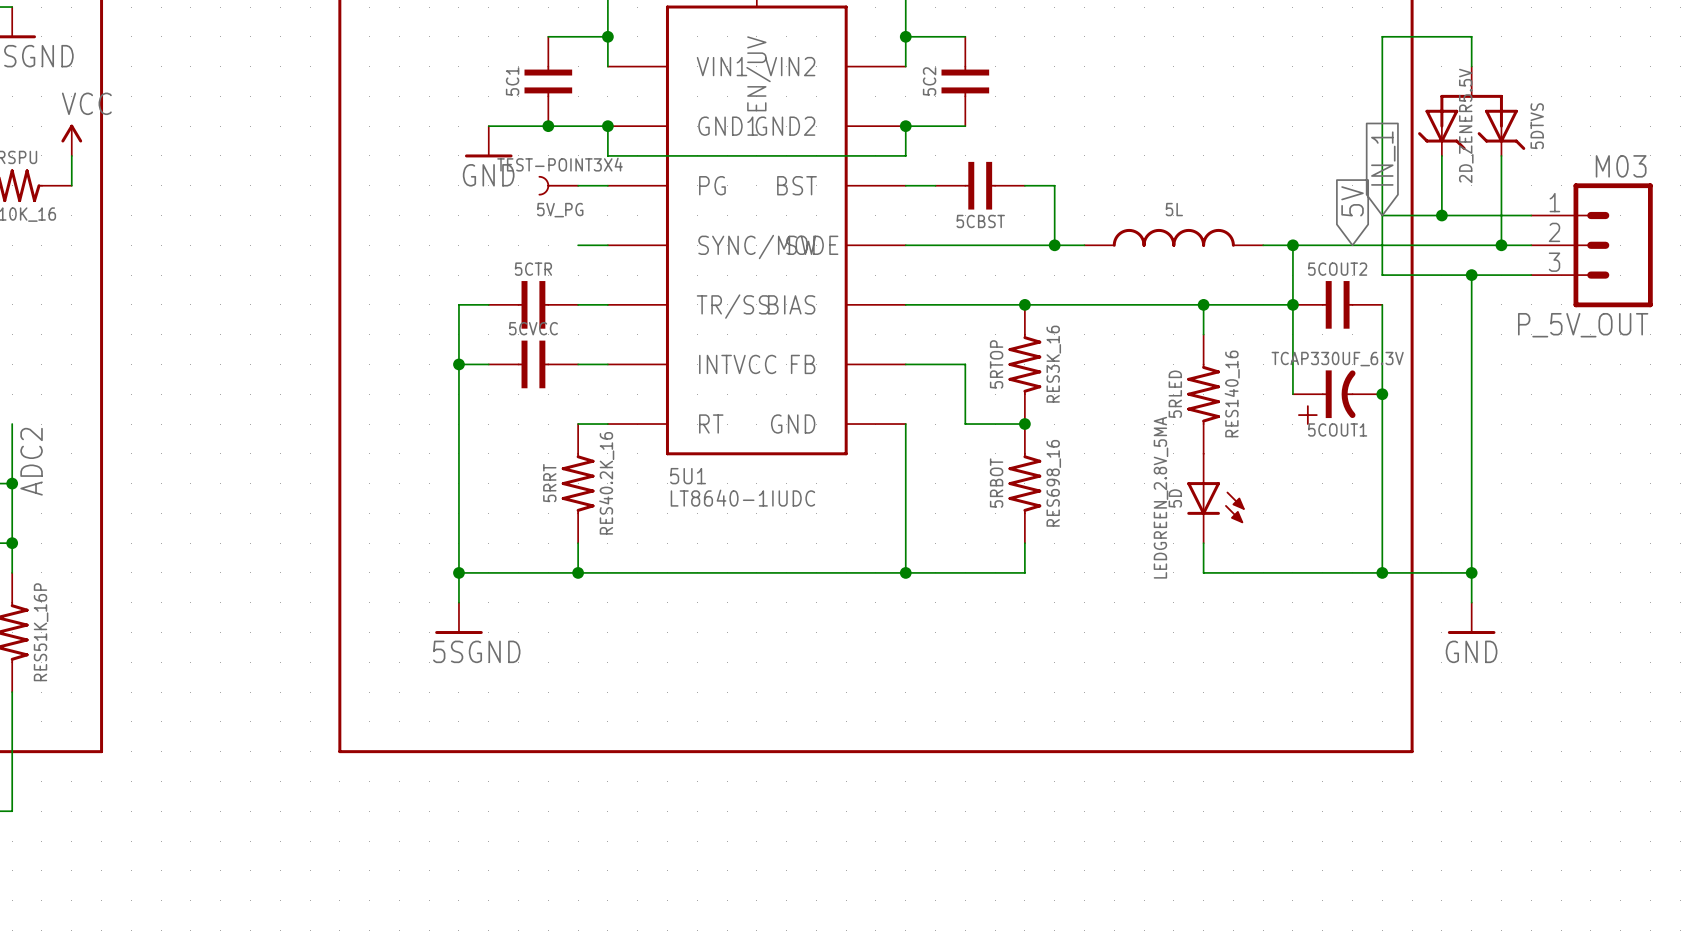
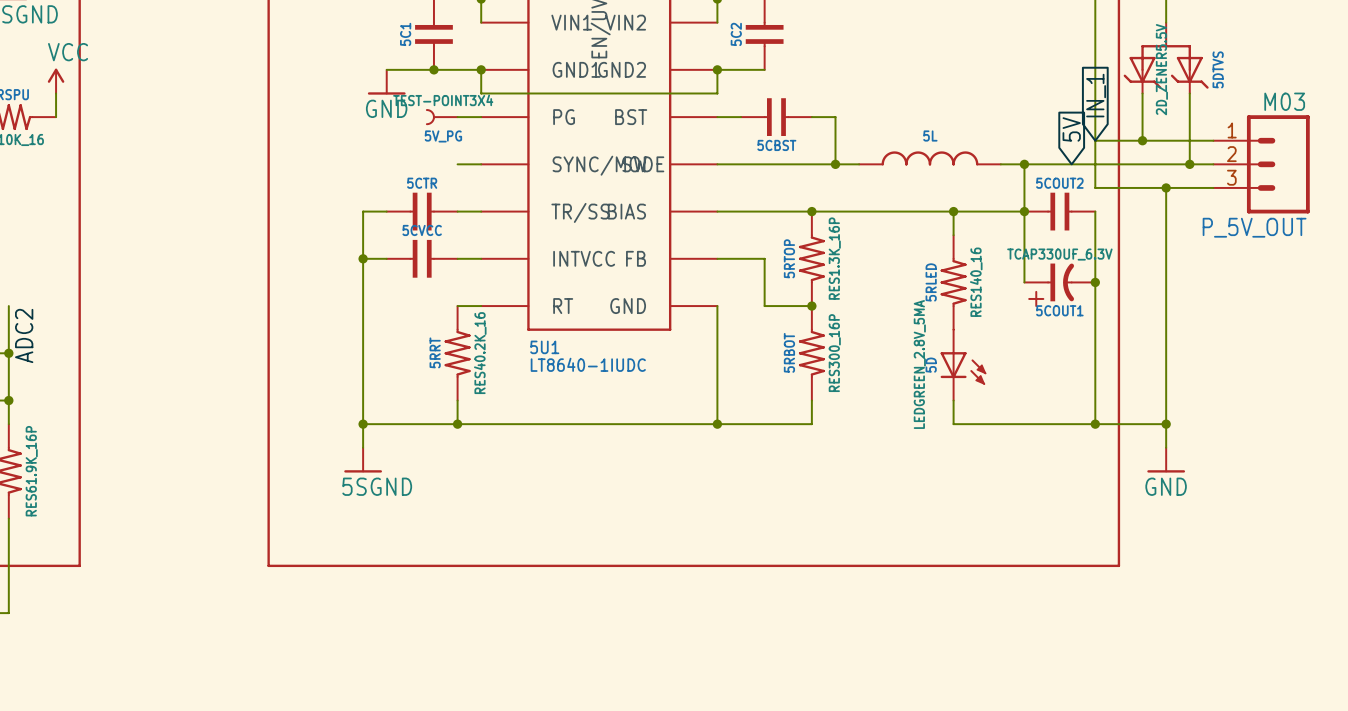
5RTOP value: RES3K_16 (1053, 364) -> RES1.3K_16P (834, 258)
5RBOT value: RES698_16 (1053, 483) -> RES300_16P (834, 353)
part value: RES51K_16P (41, 632) -> RES61.9K_16P (31, 471)

